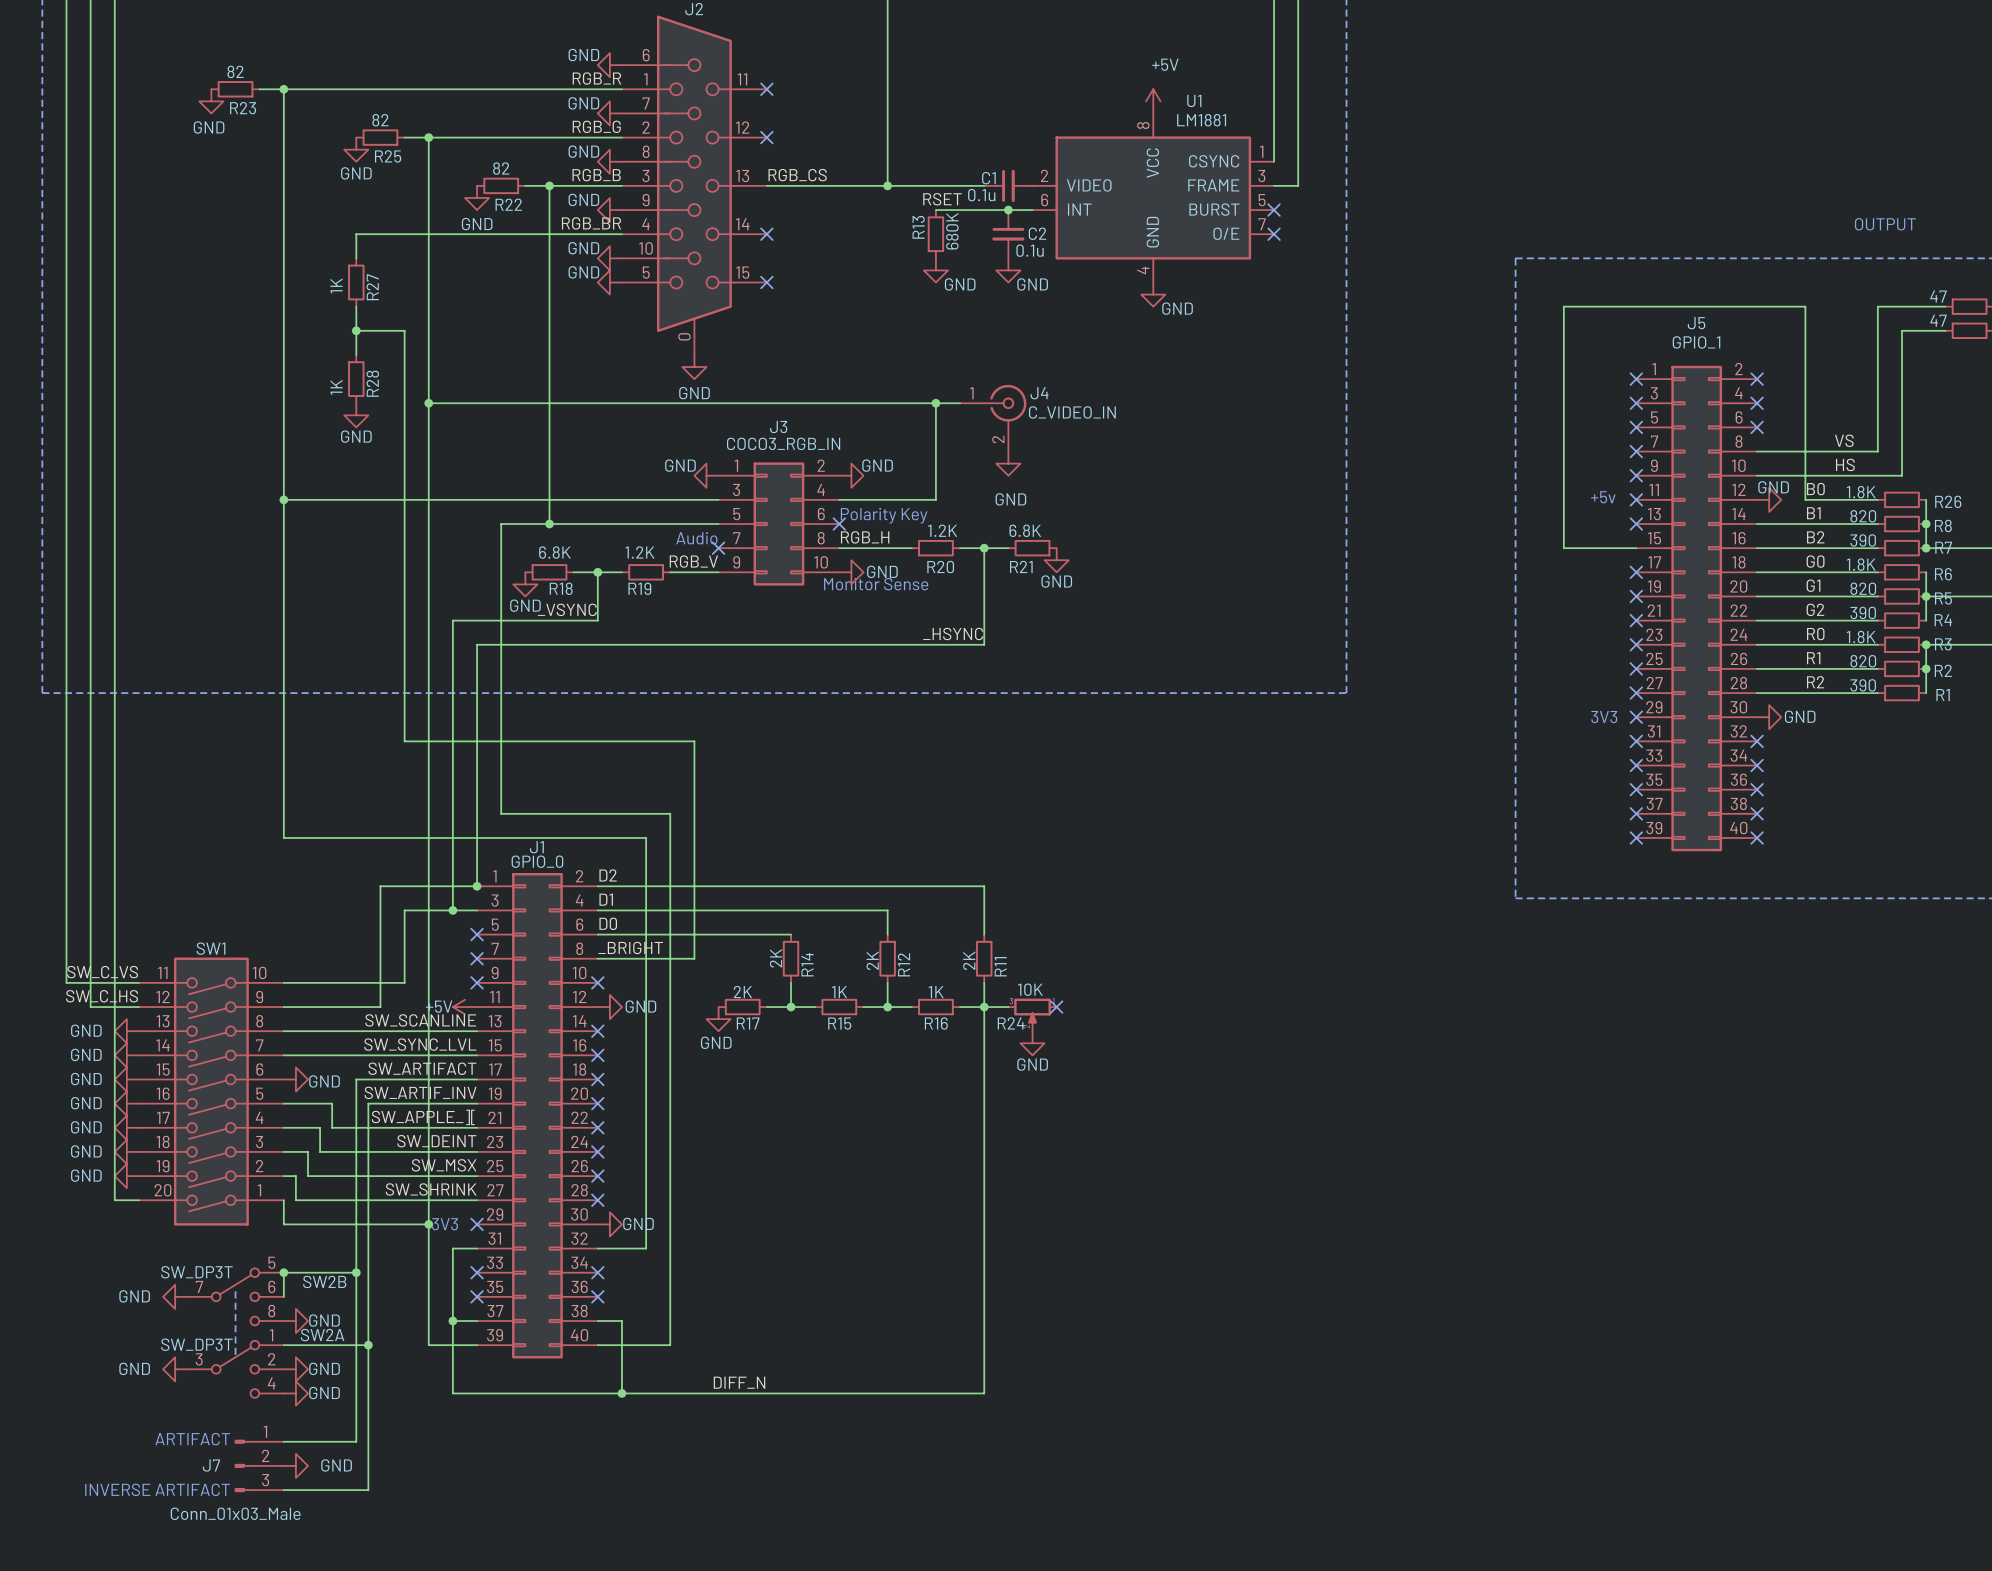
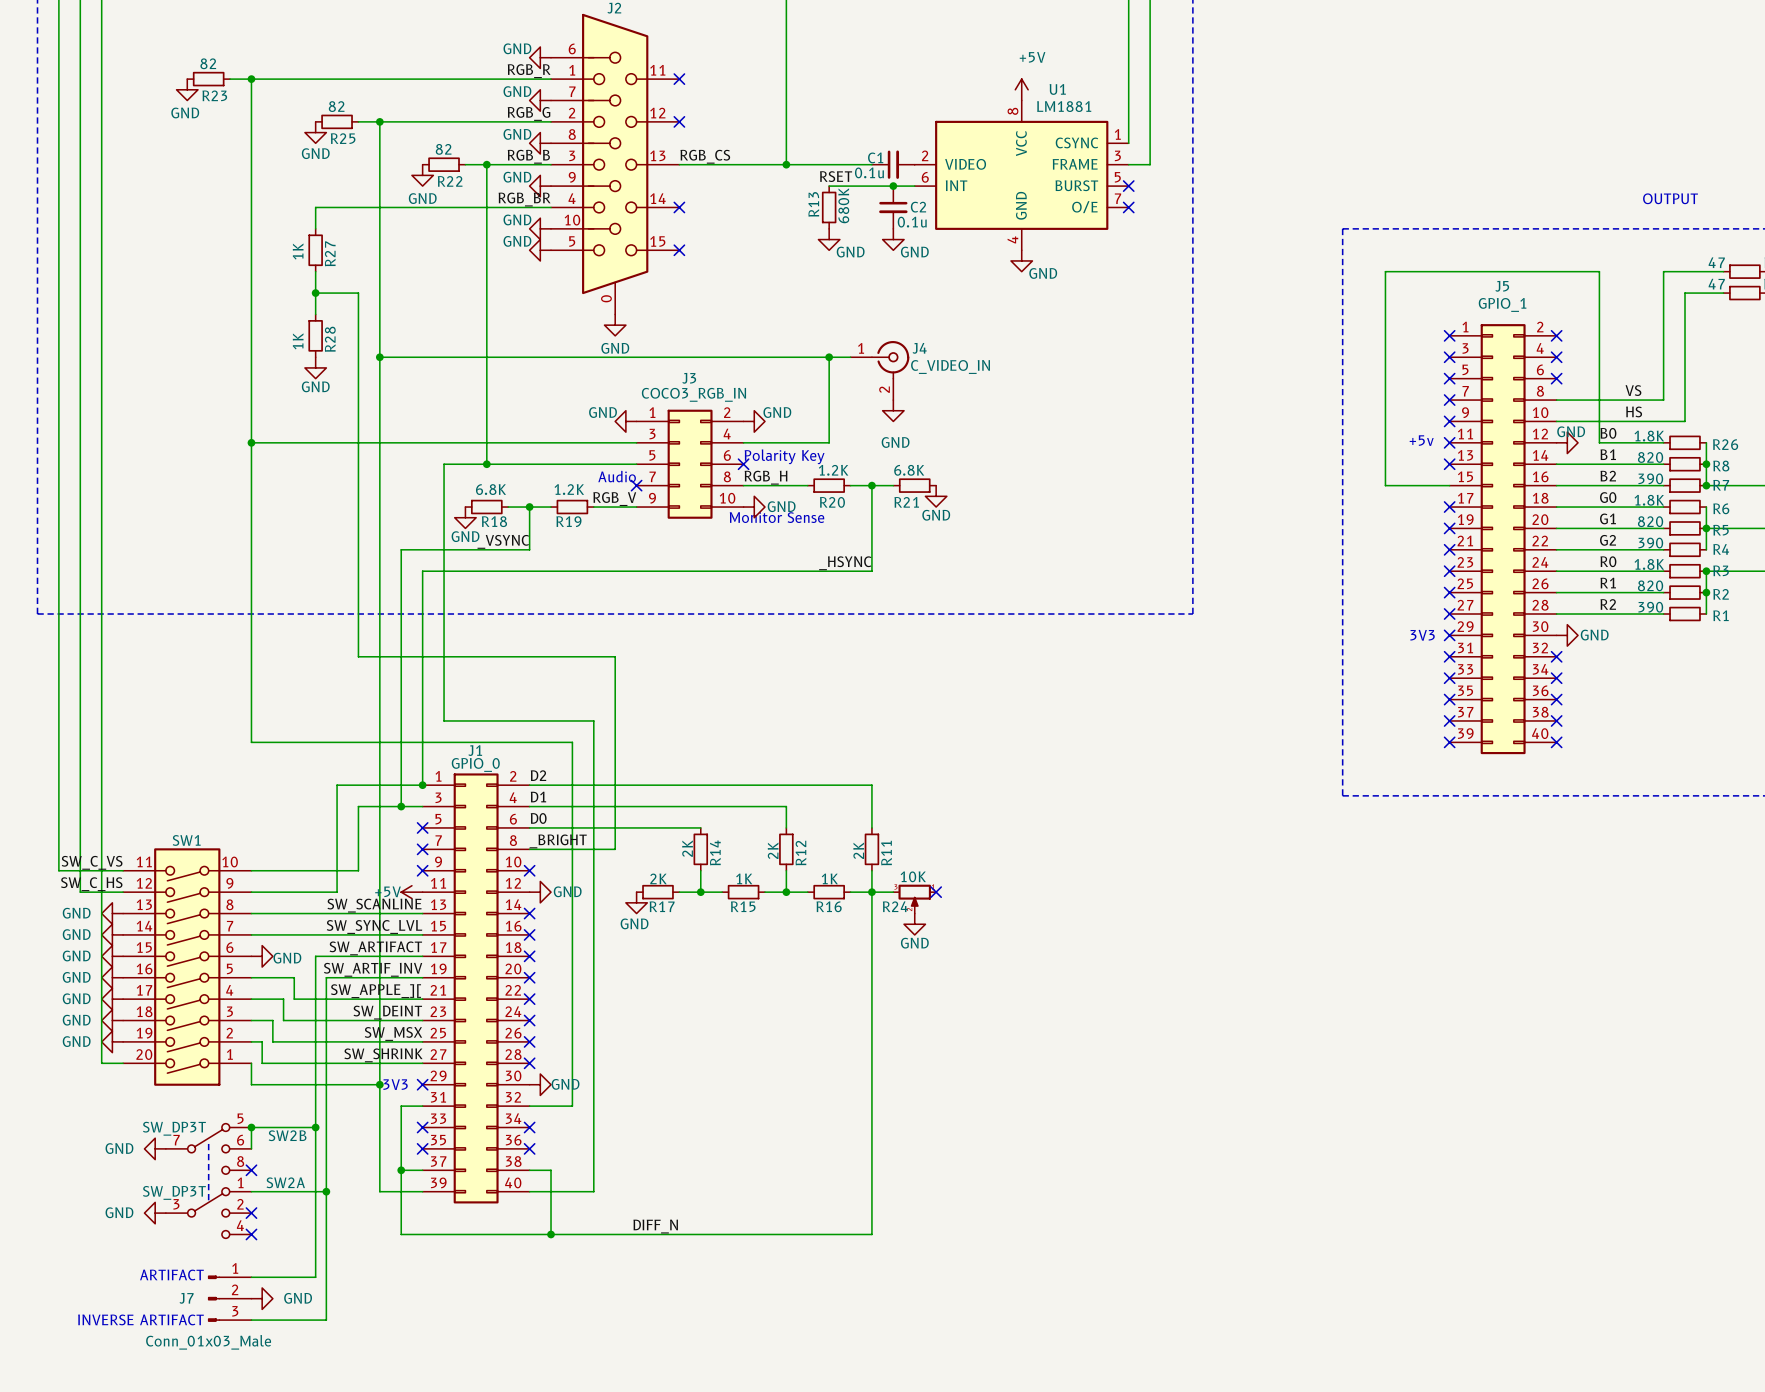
no-connect mark: none -> (251, 1170)
power symbol: GND (295, 1321) -> none
no-connect mark: none -> (251, 1213)
power symbol: GND (295, 1369) -> none
no-connect mark: none -> (251, 1234)
power symbol: GND (295, 1393) -> none

